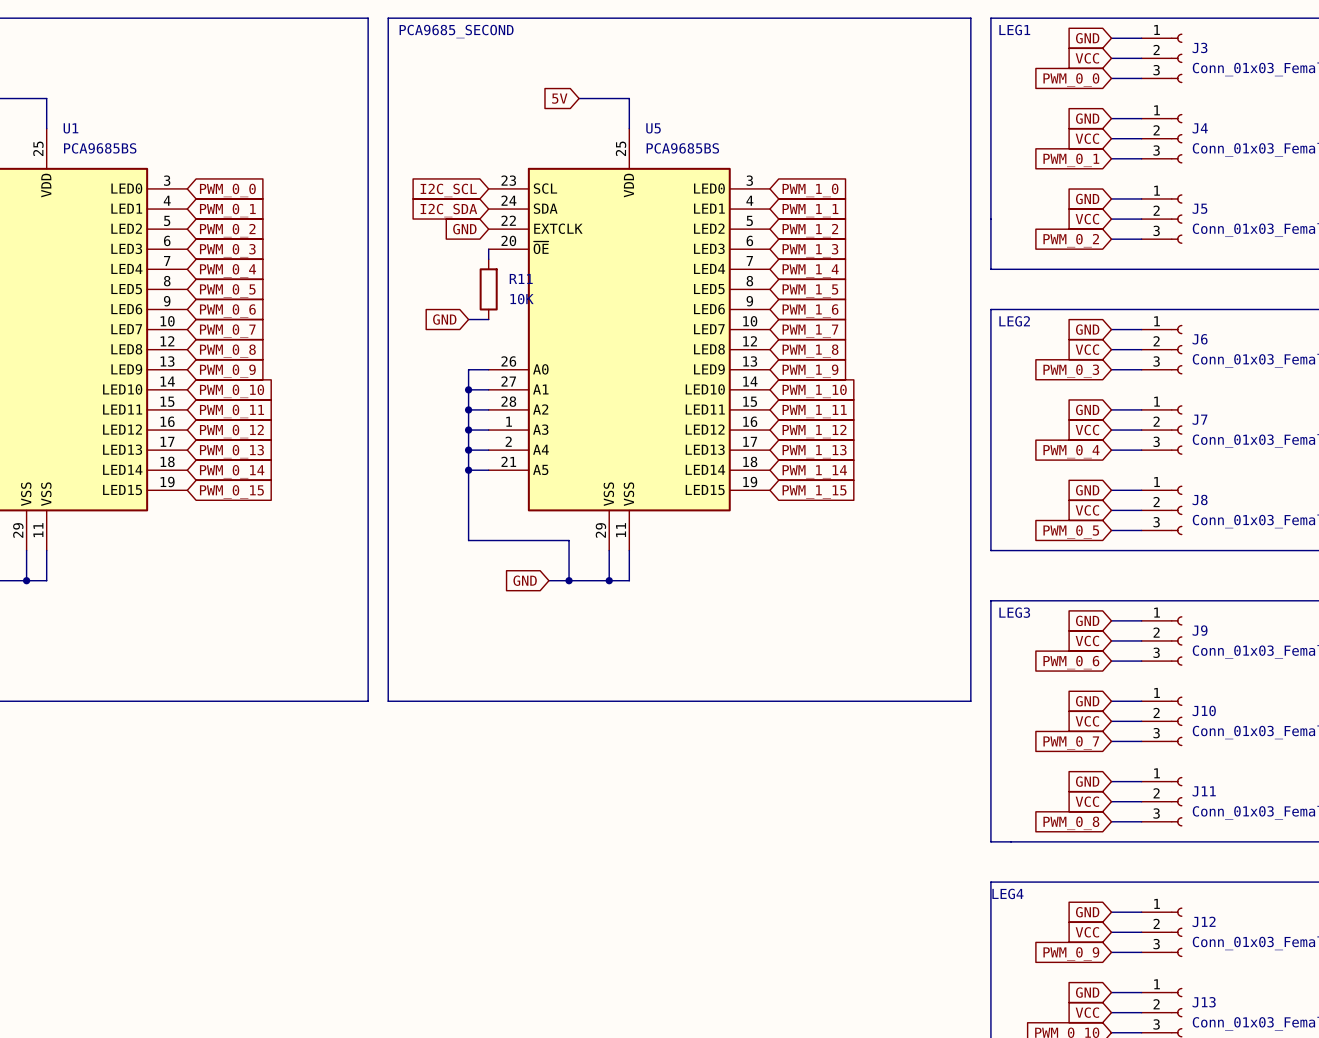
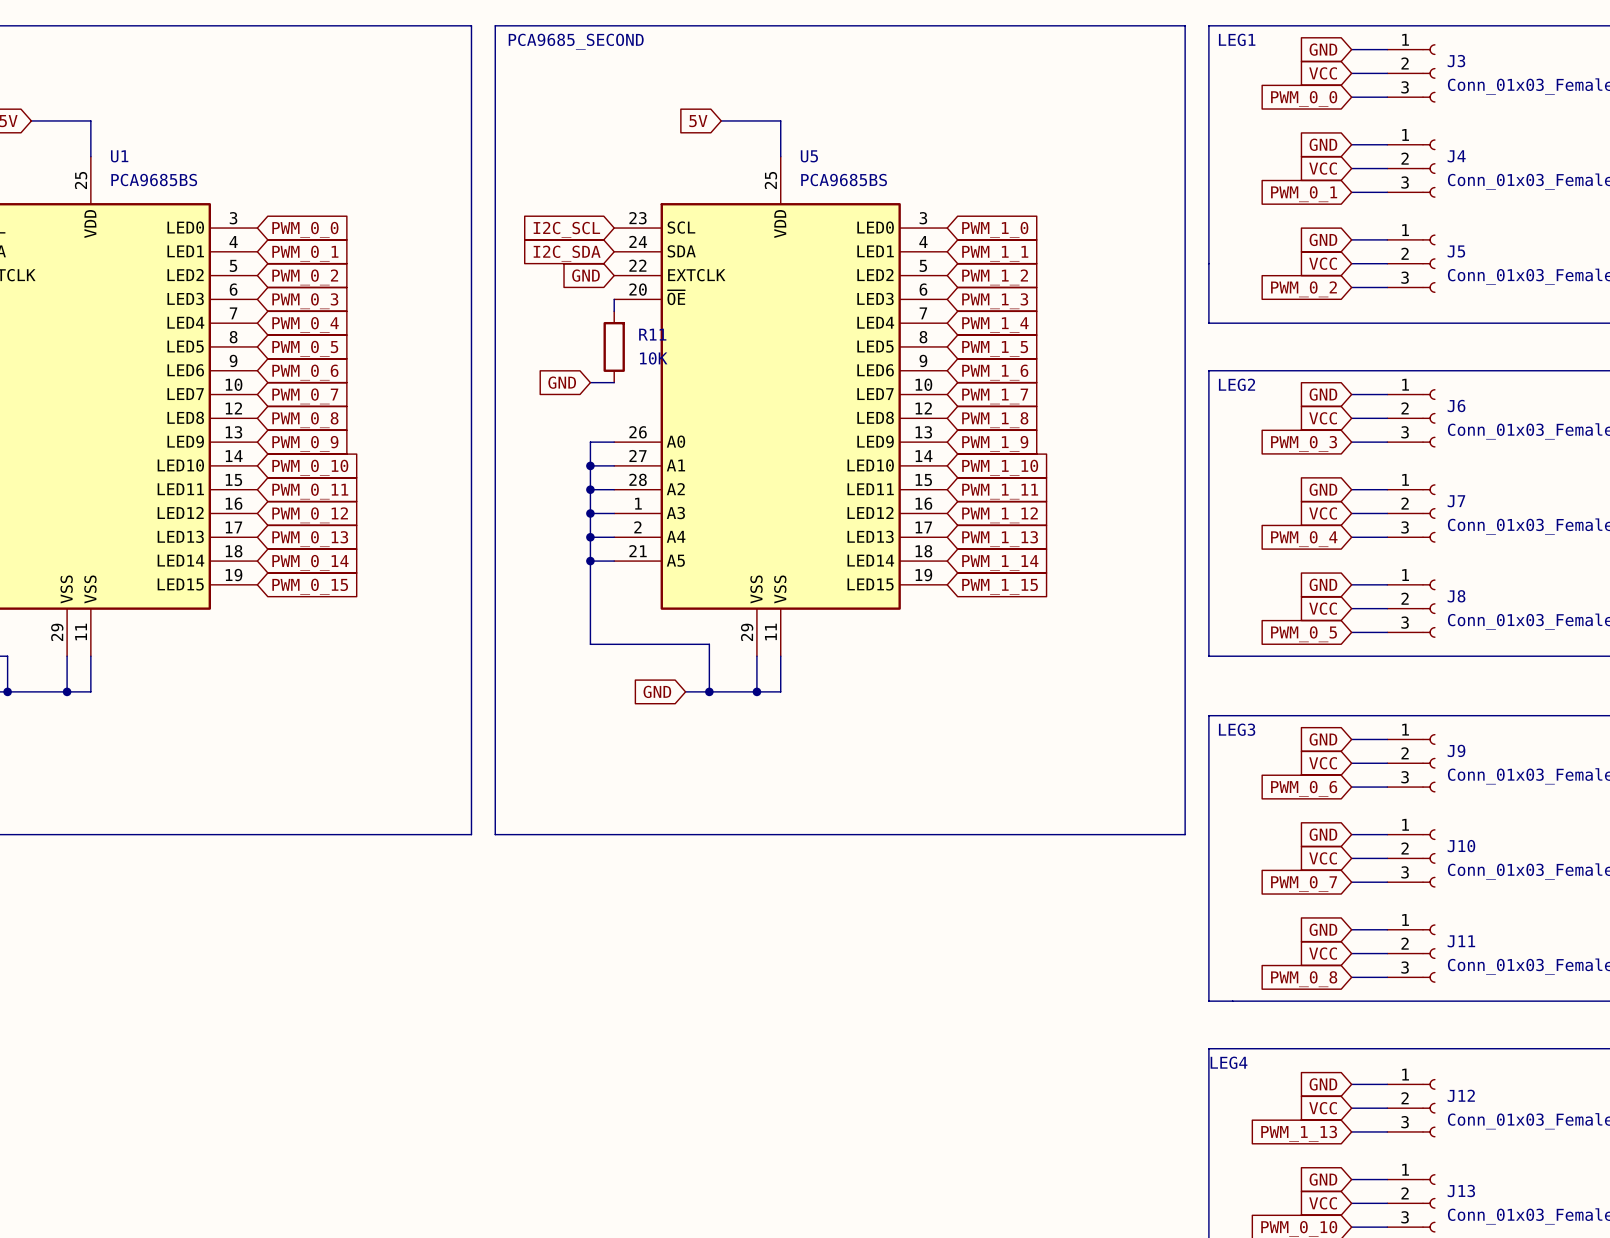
global label: PWM_0_9 (1071, 953) -> PWM_1_13 (1299, 1133)

